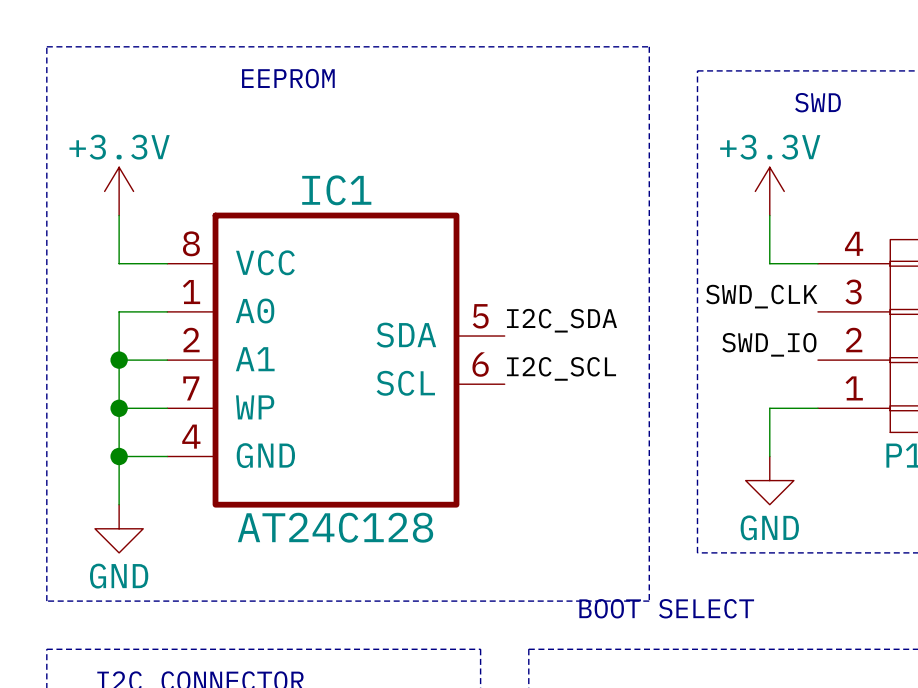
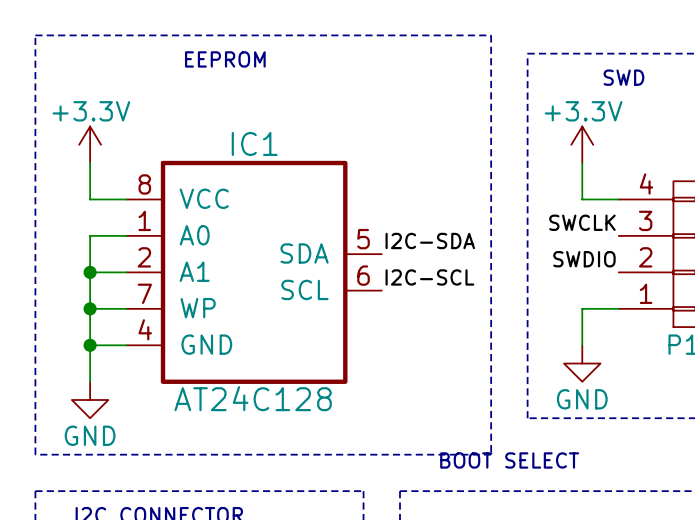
label: SWD_CLK (761, 296) -> SWCLK (582, 222)
label: I2C_SDA (561, 320) -> I2C-SDA (430, 240)
label: SWD_IO (769, 344) -> SWDIO (584, 259)
label: I2C_SCL (561, 368) -> I2C-SCL (429, 277)

